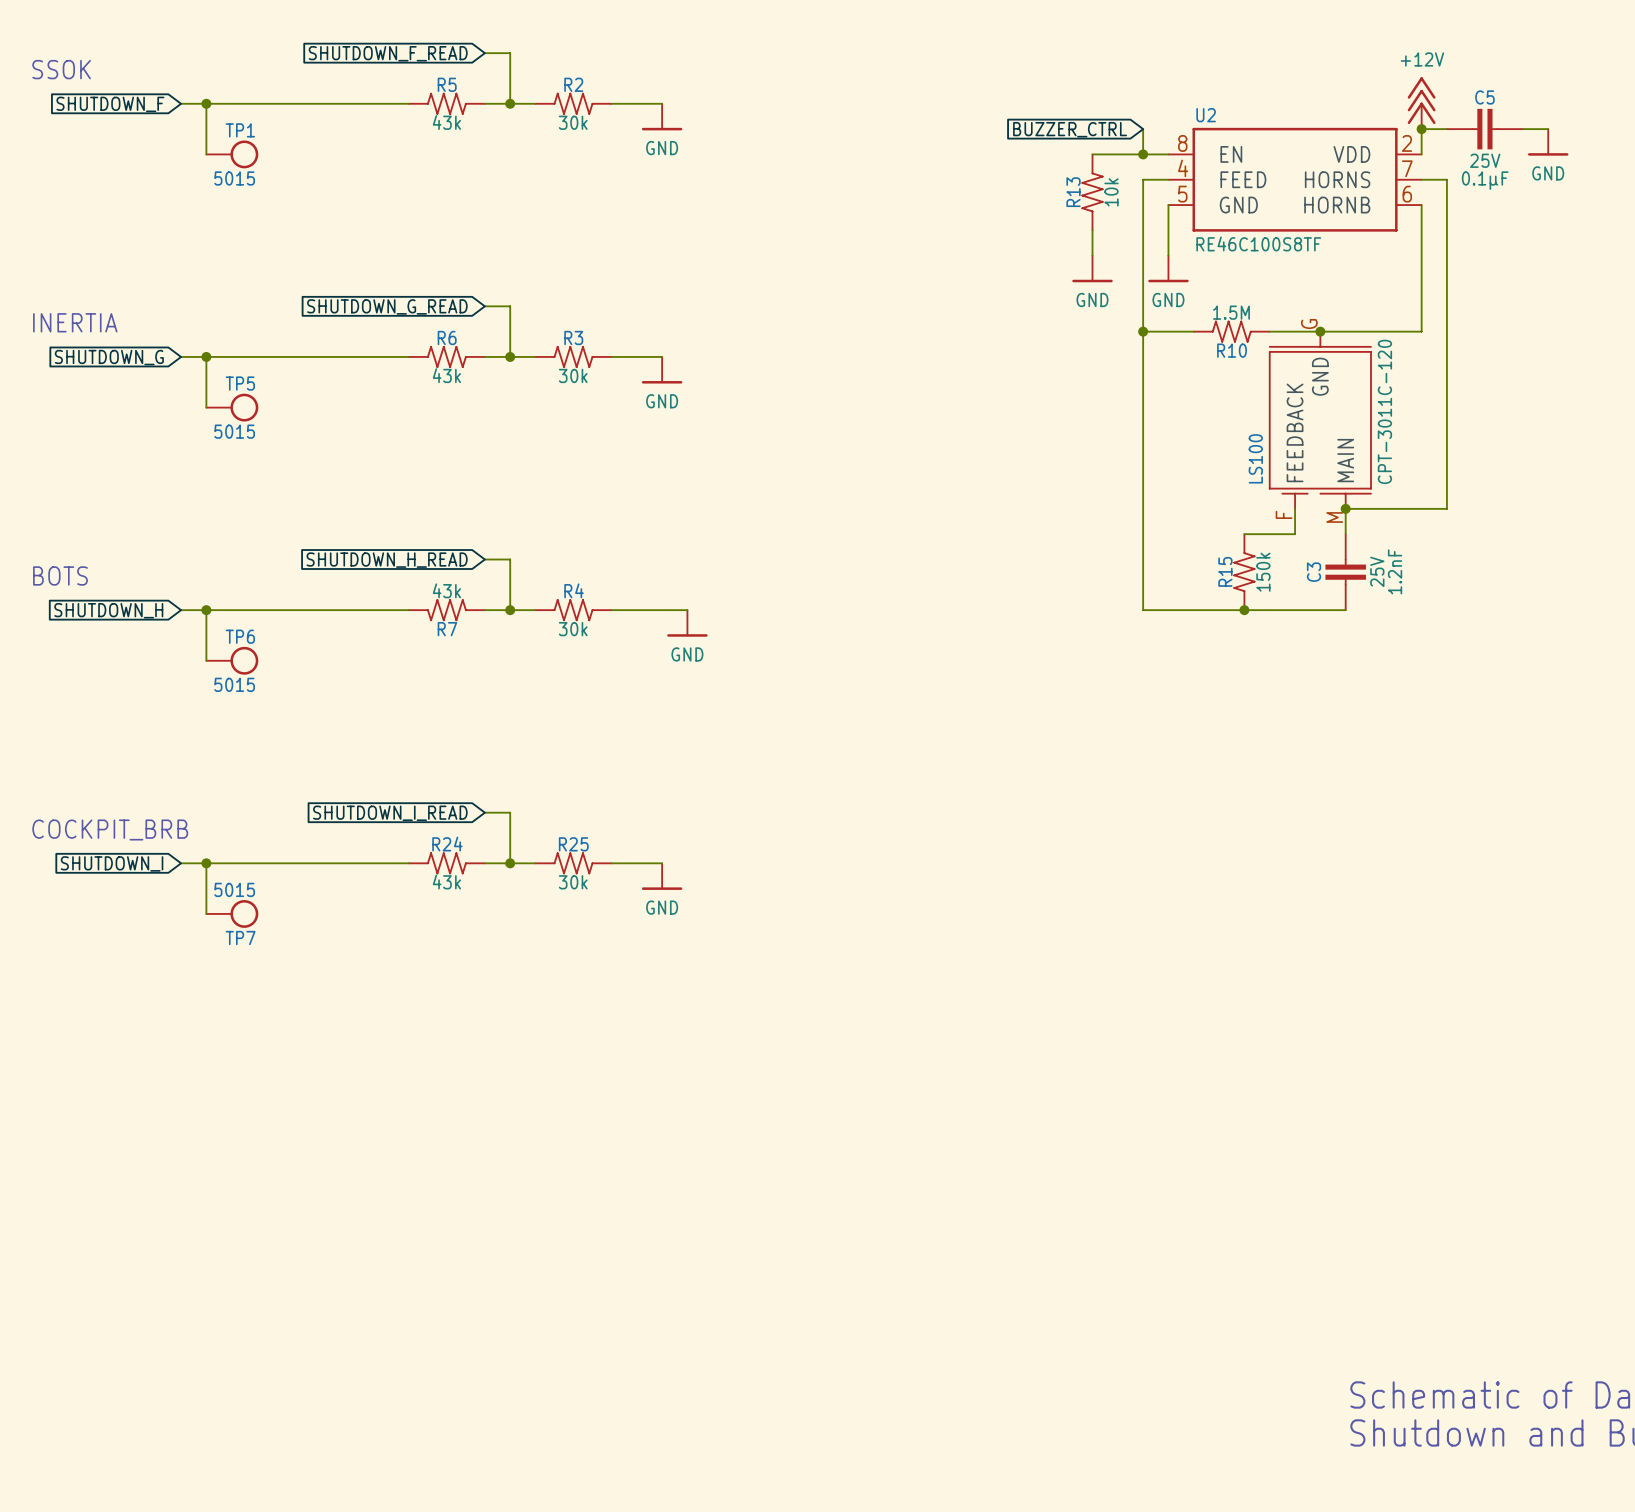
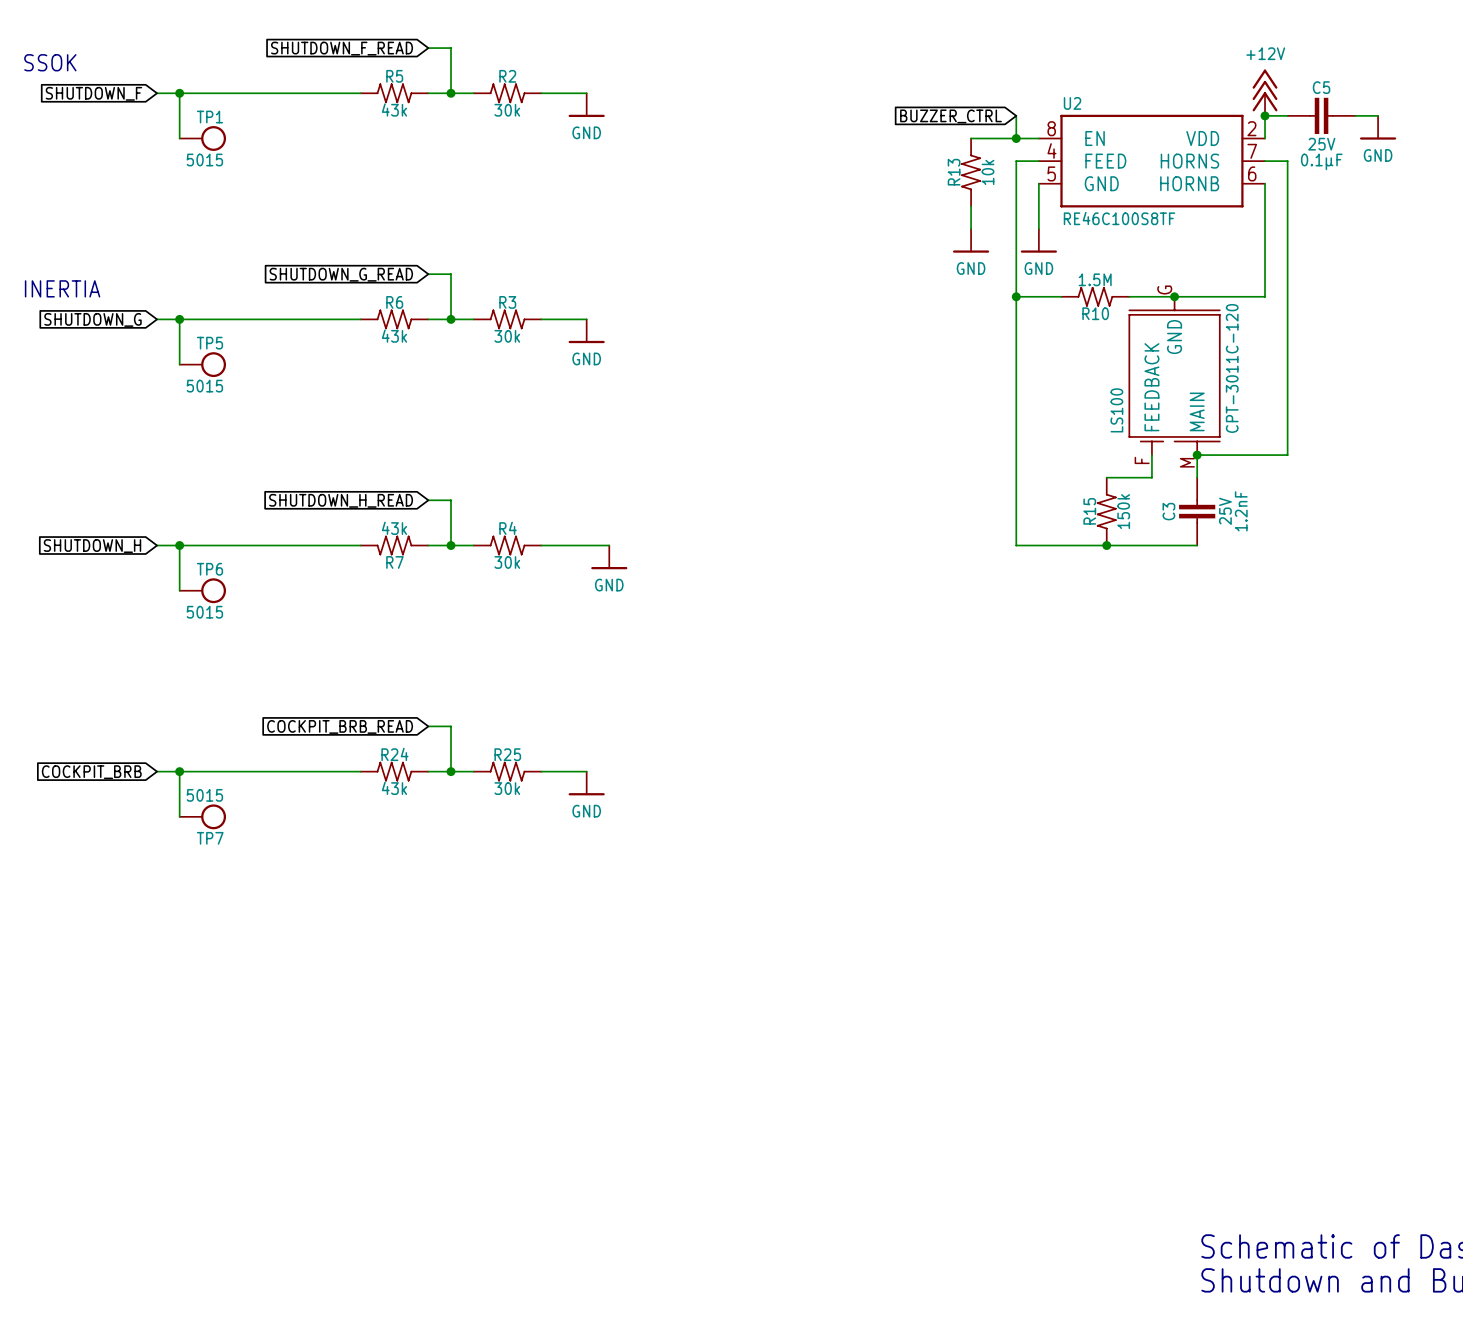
text: BOTS (60, 575) -> none
global label: SHUTDOWN_I_READ (390, 813) -> COCKPIT_BRB_READ (340, 726)
text: COCKPIT_BRB (110, 829) -> none
global label: SHUTDOWN_I (112, 863) -> COCKPIT_BRB (91, 772)

